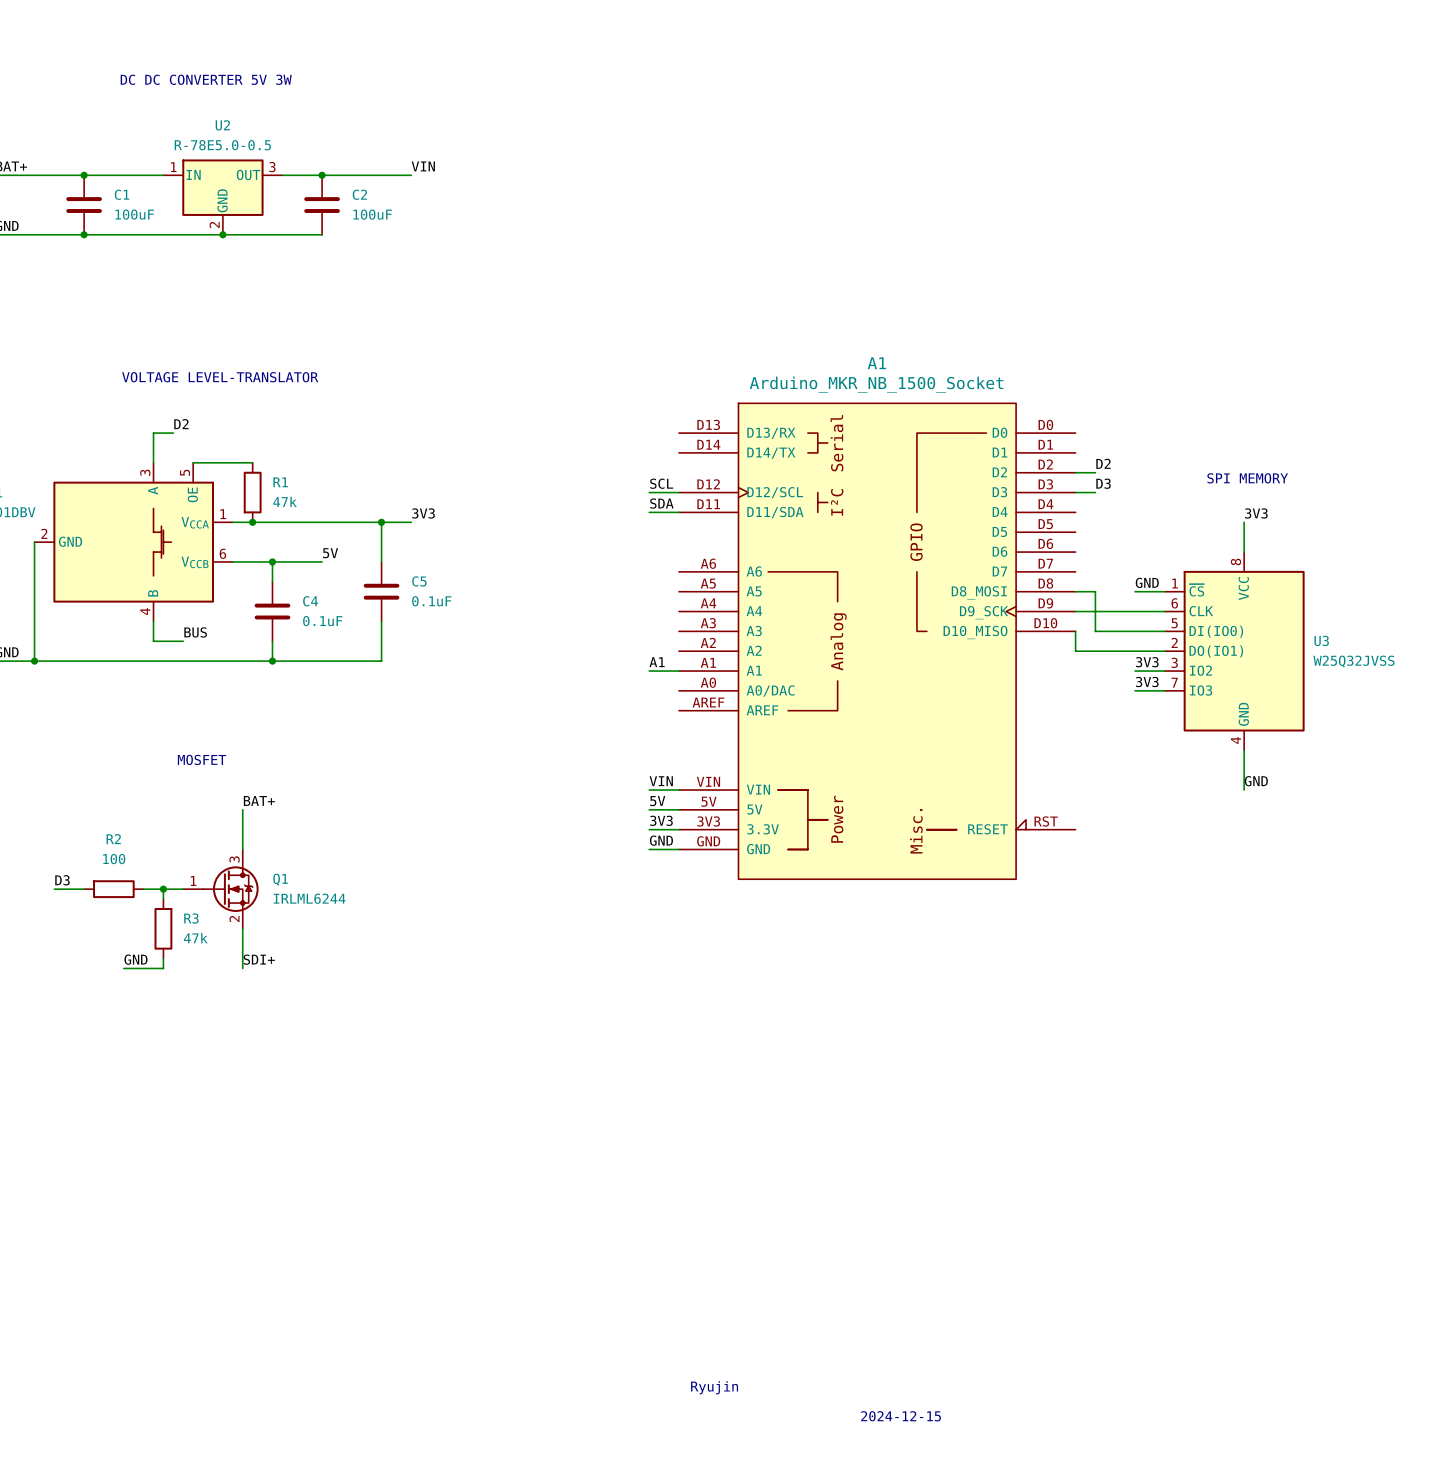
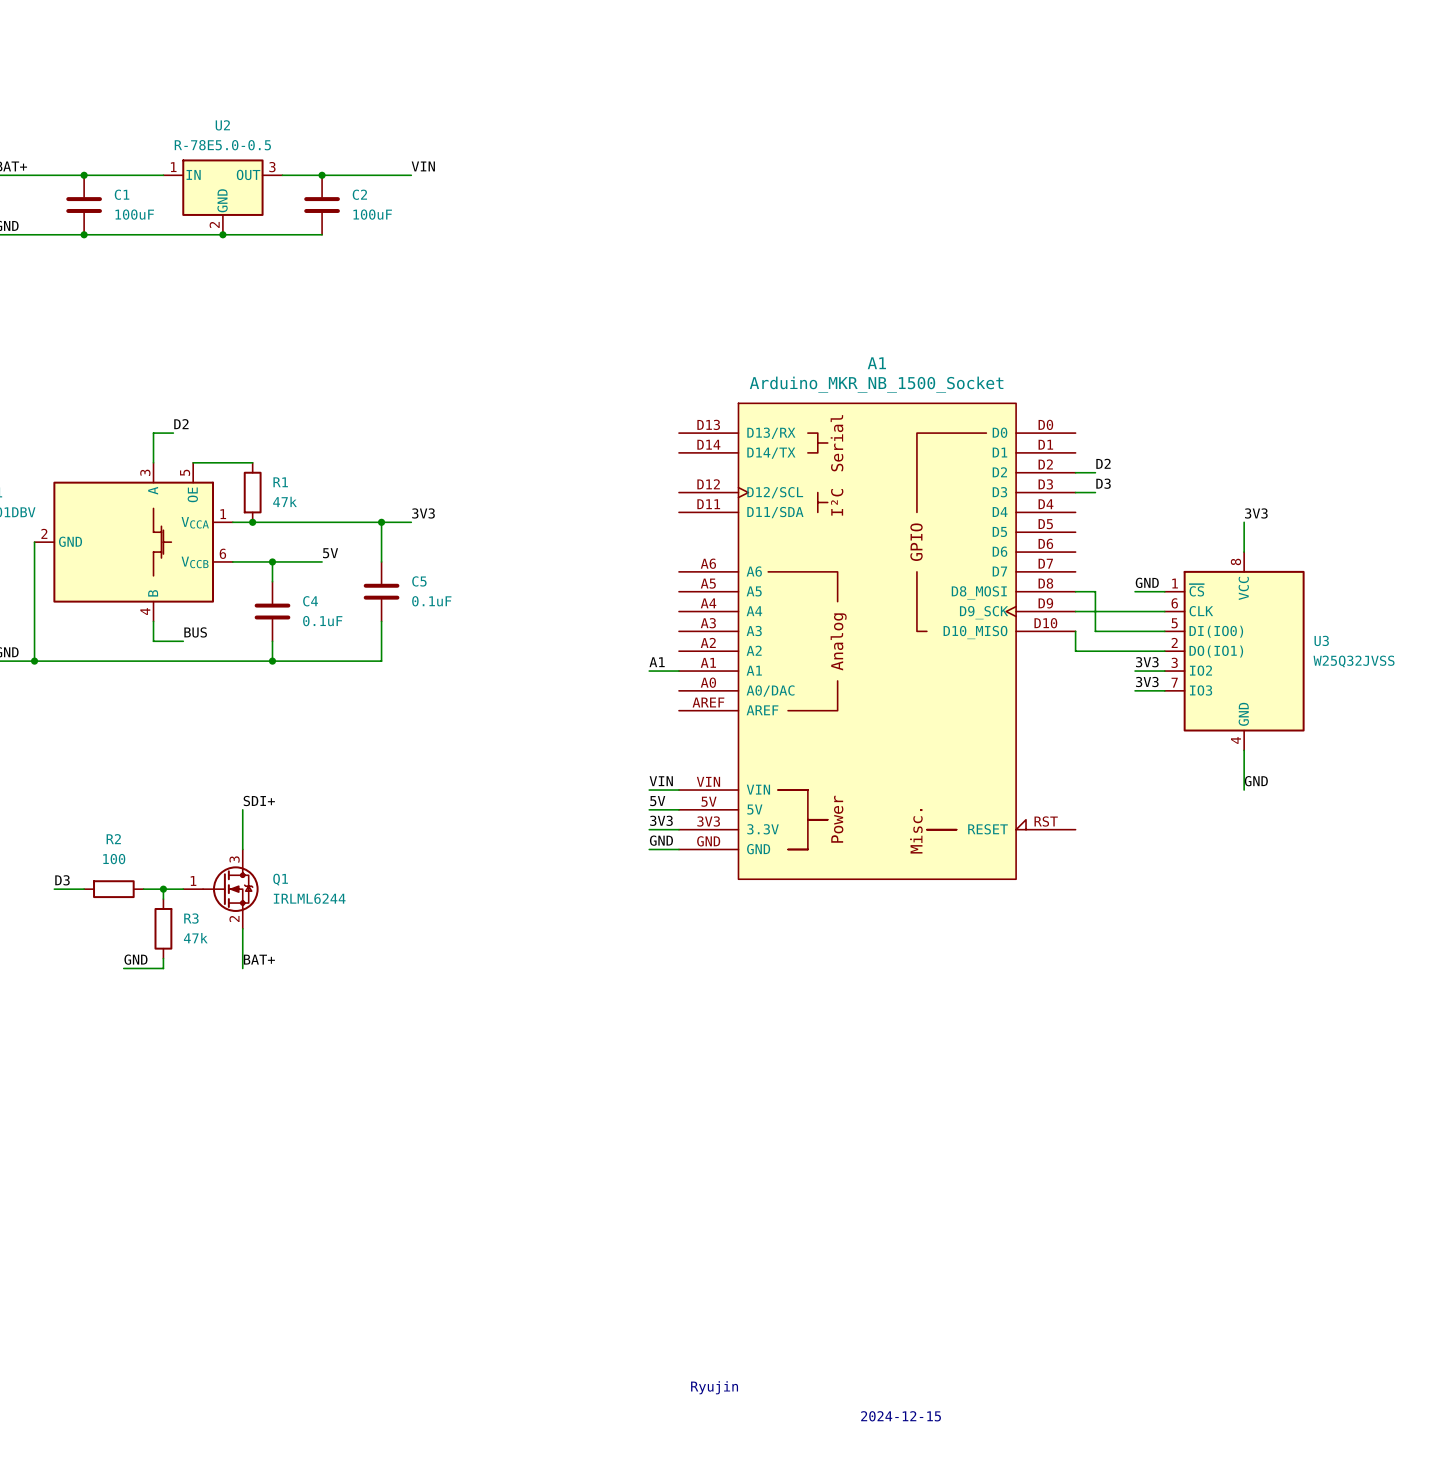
text: DC DC CONVERTER 5V 3W (206, 79) -> none
text: VOLTAGE LEVEL-TRANSLATOR (220, 377) -> none
text: SPI MEMORY (1247, 478) -> none
label: SCL (661, 483) -> none
wire: (649, 492) (678, 492) -> none
label: SDA (661, 503) -> none
wire: (649, 512) (678, 512) -> none
text: MOSFET (202, 759) -> none
label: BAT+ (259, 800) -> SDI+ (259, 801)
label: SDI+ (259, 959) -> BAT+ (259, 959)

